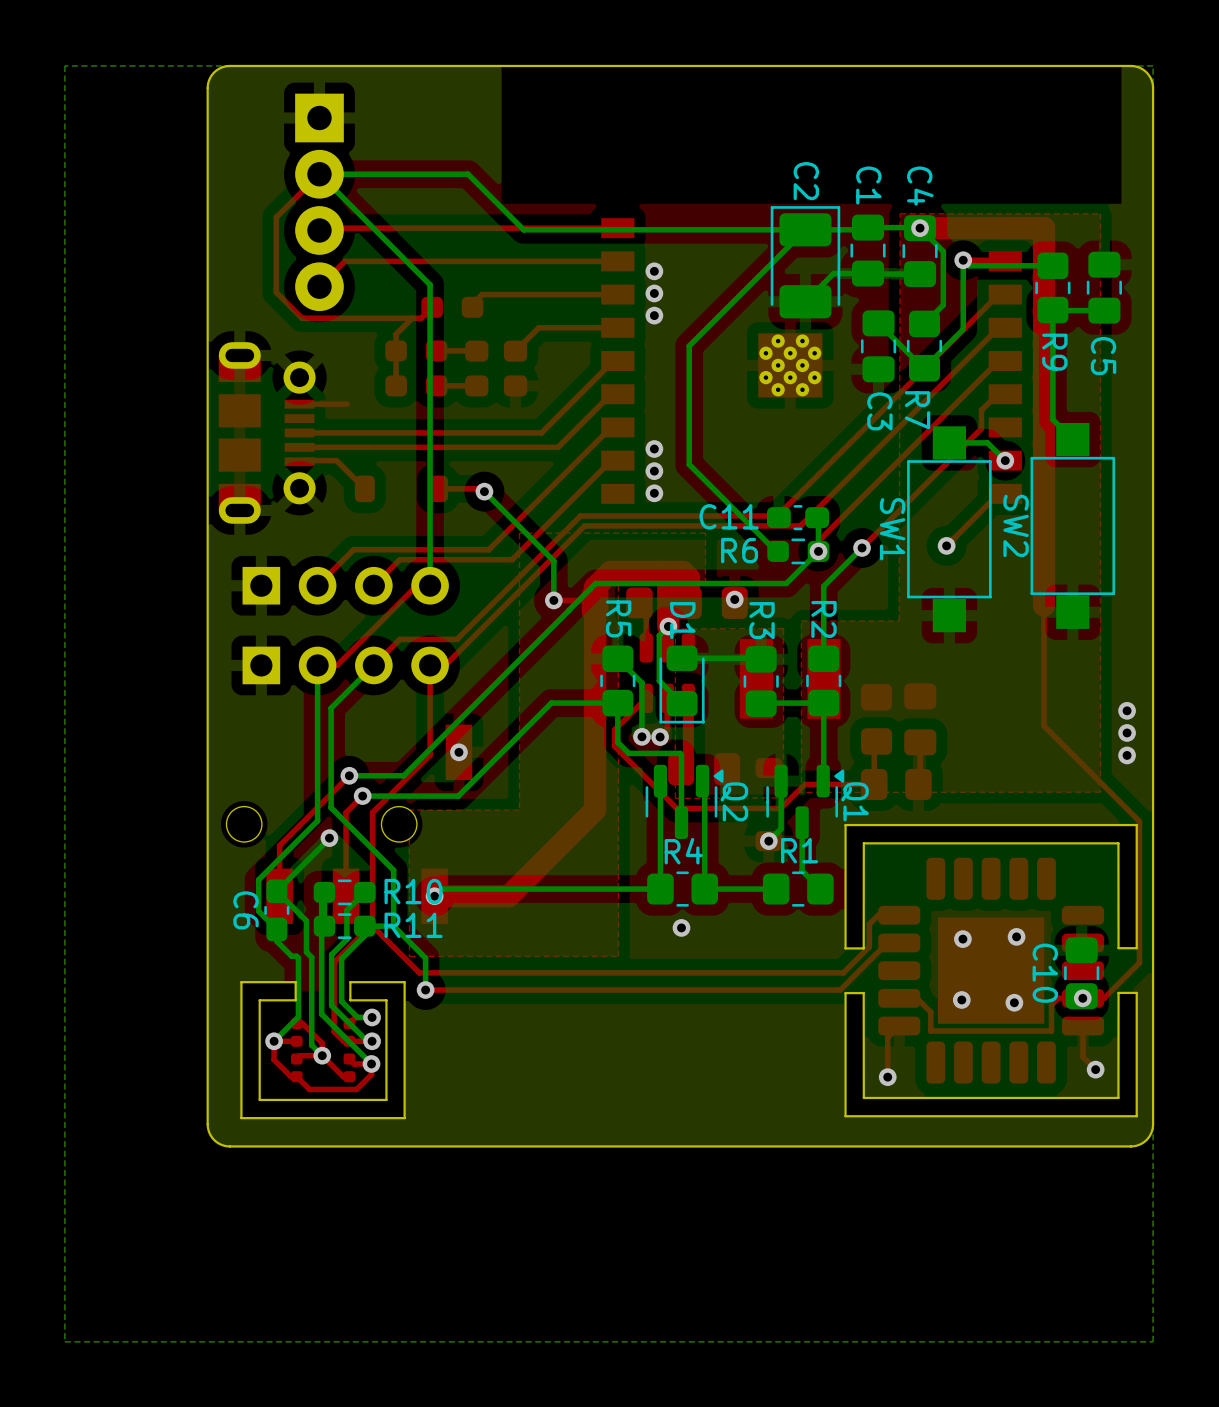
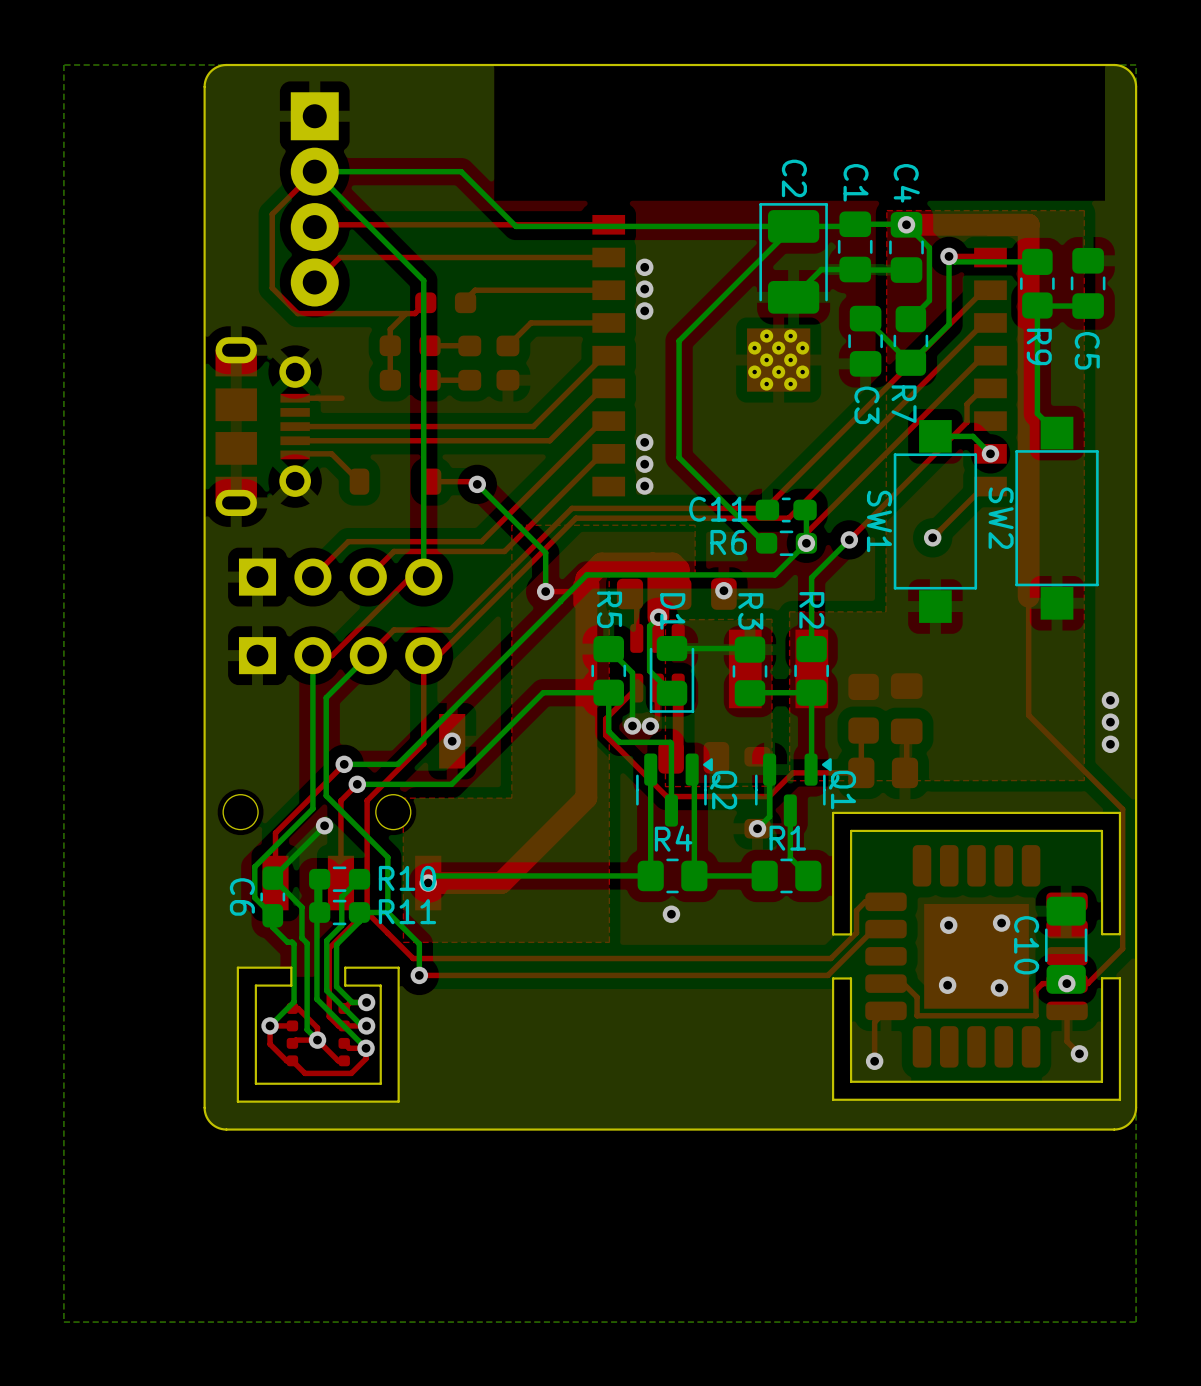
C10 footprint: [1064, 937, 1100, 1010] -> [1045, 896, 1088, 994]

